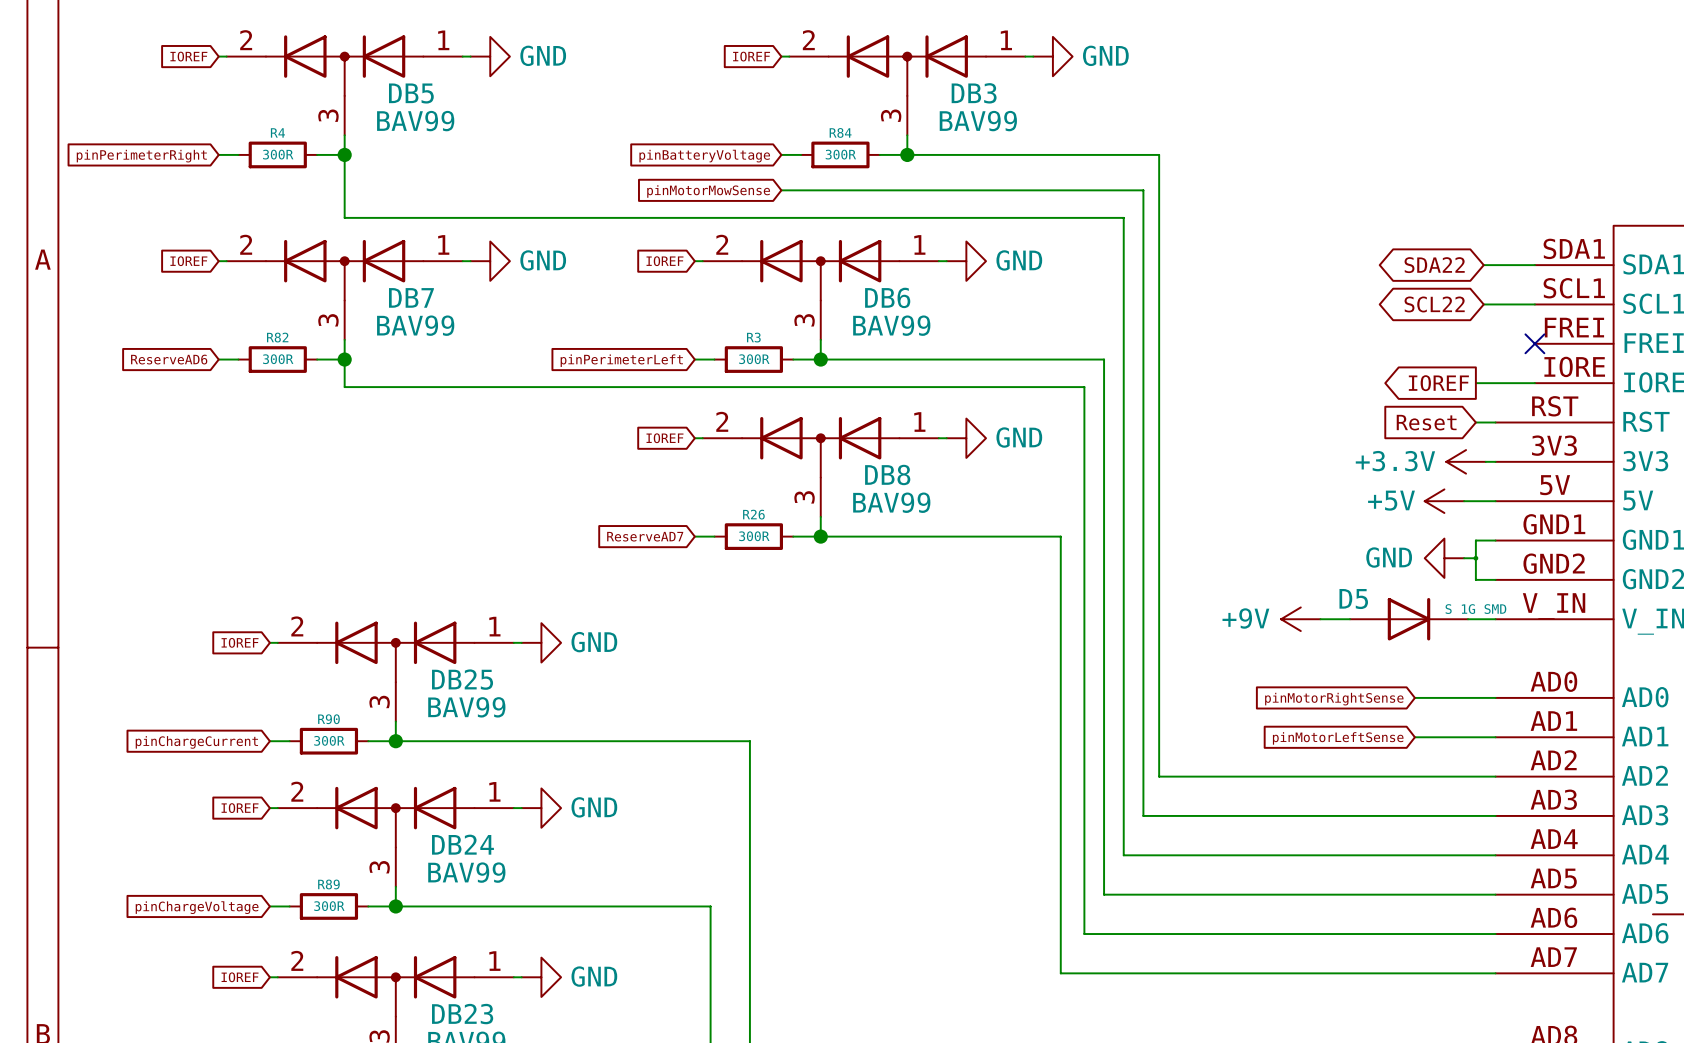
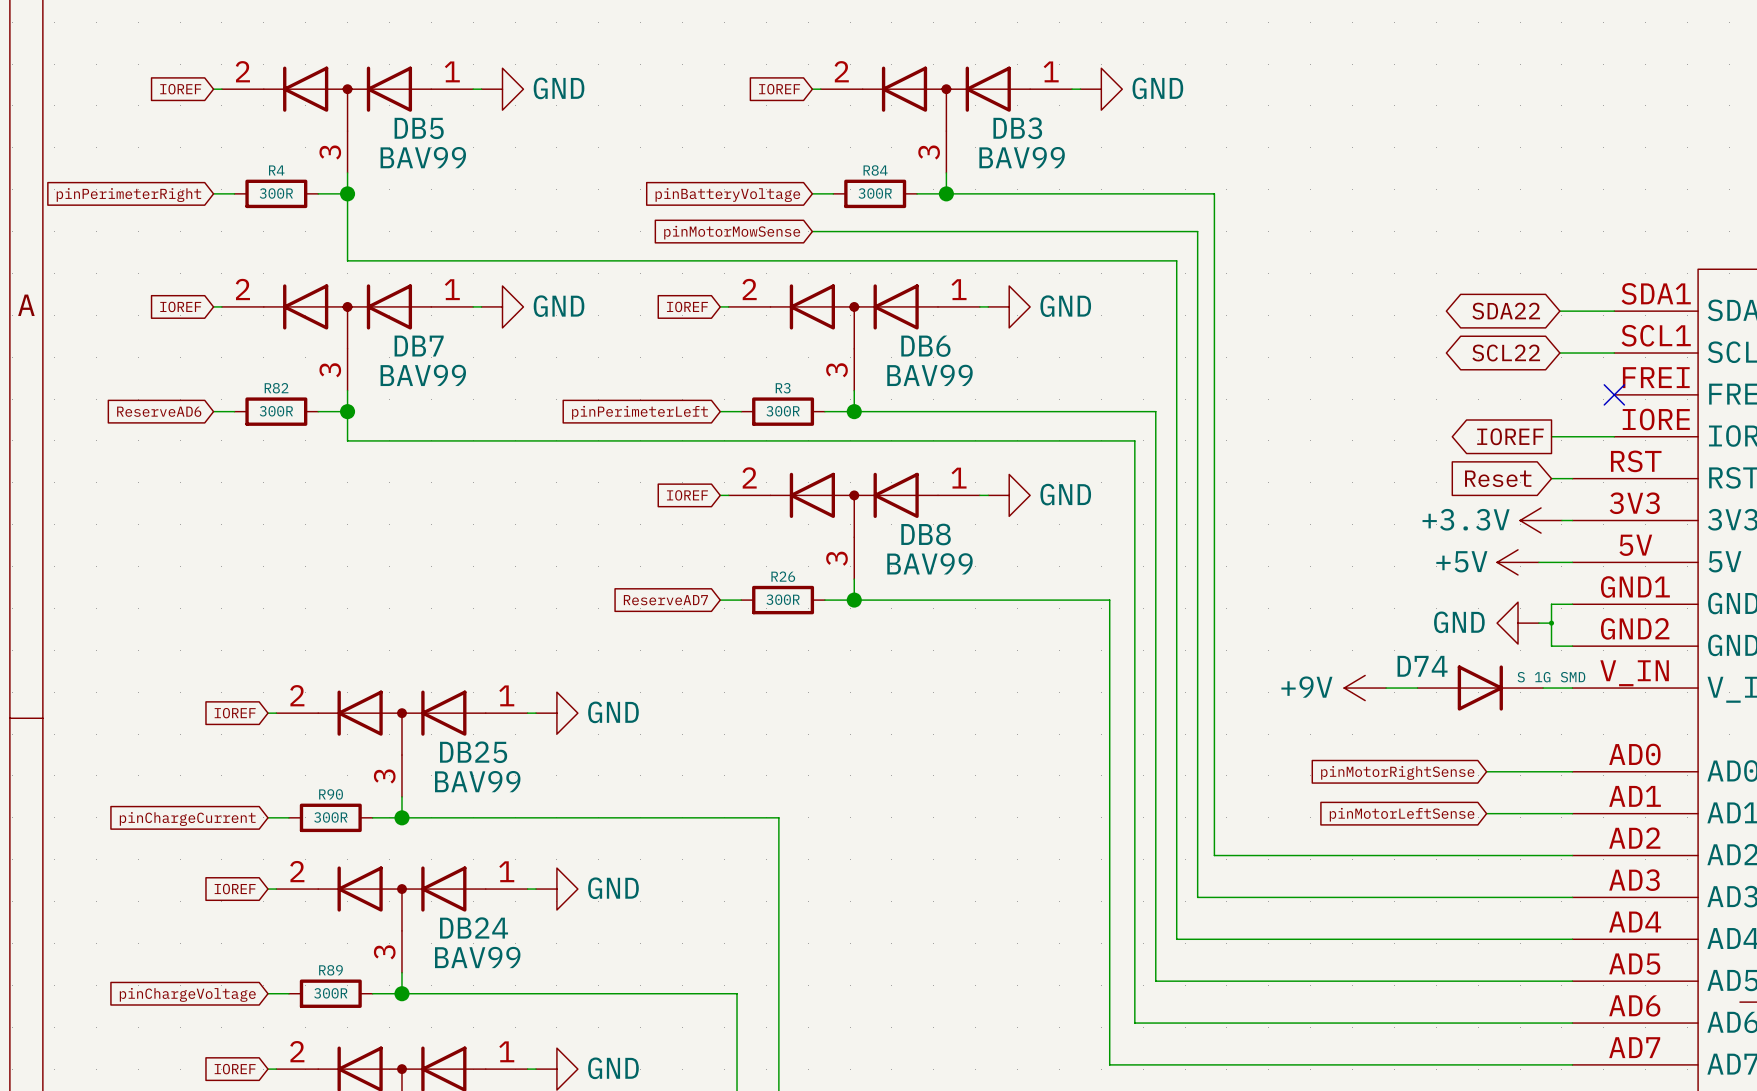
D5 name: D5 (1353, 599) -> D74 (1422, 666)

